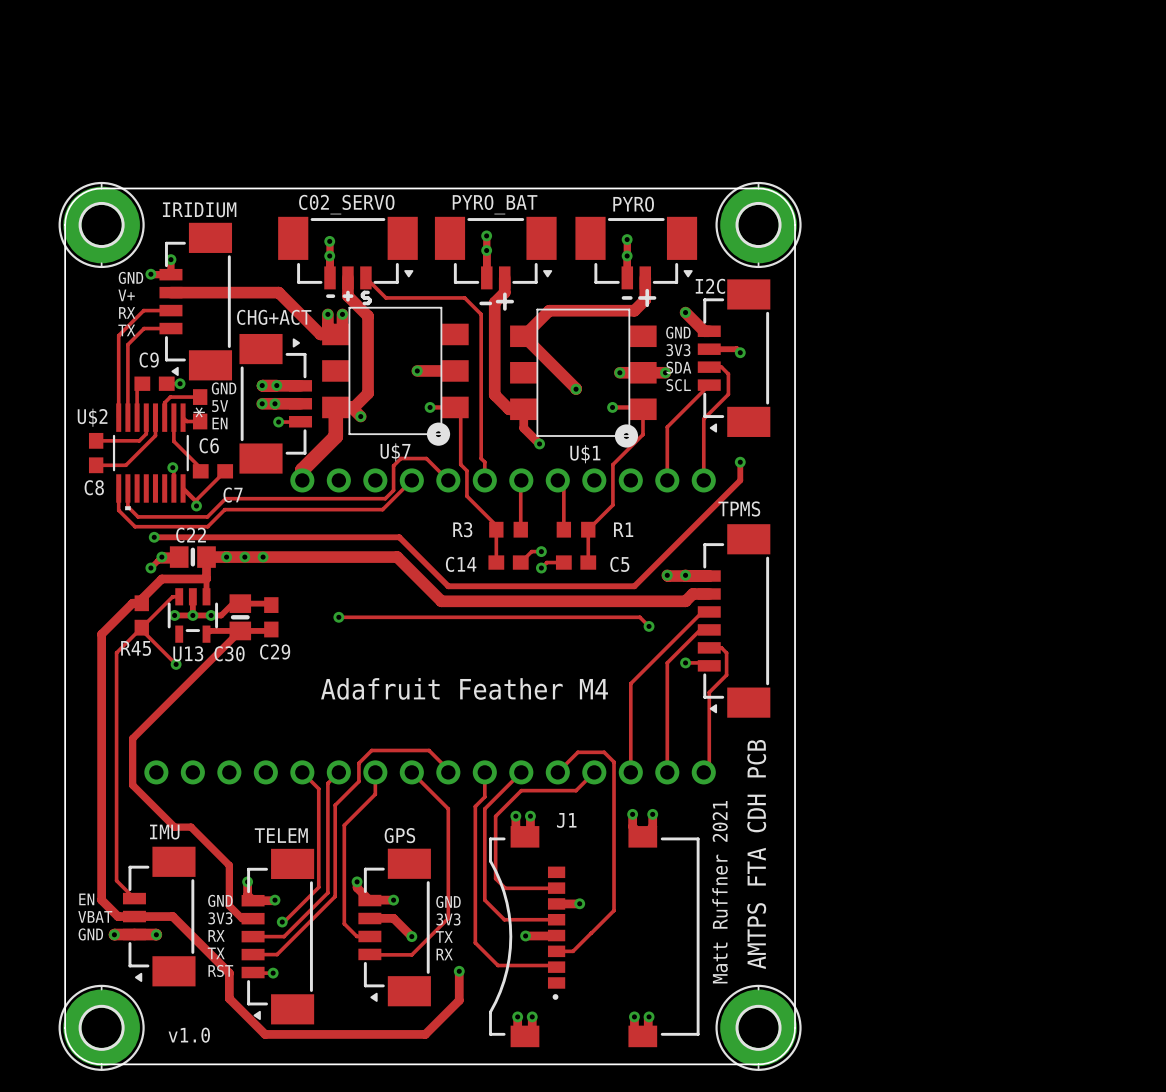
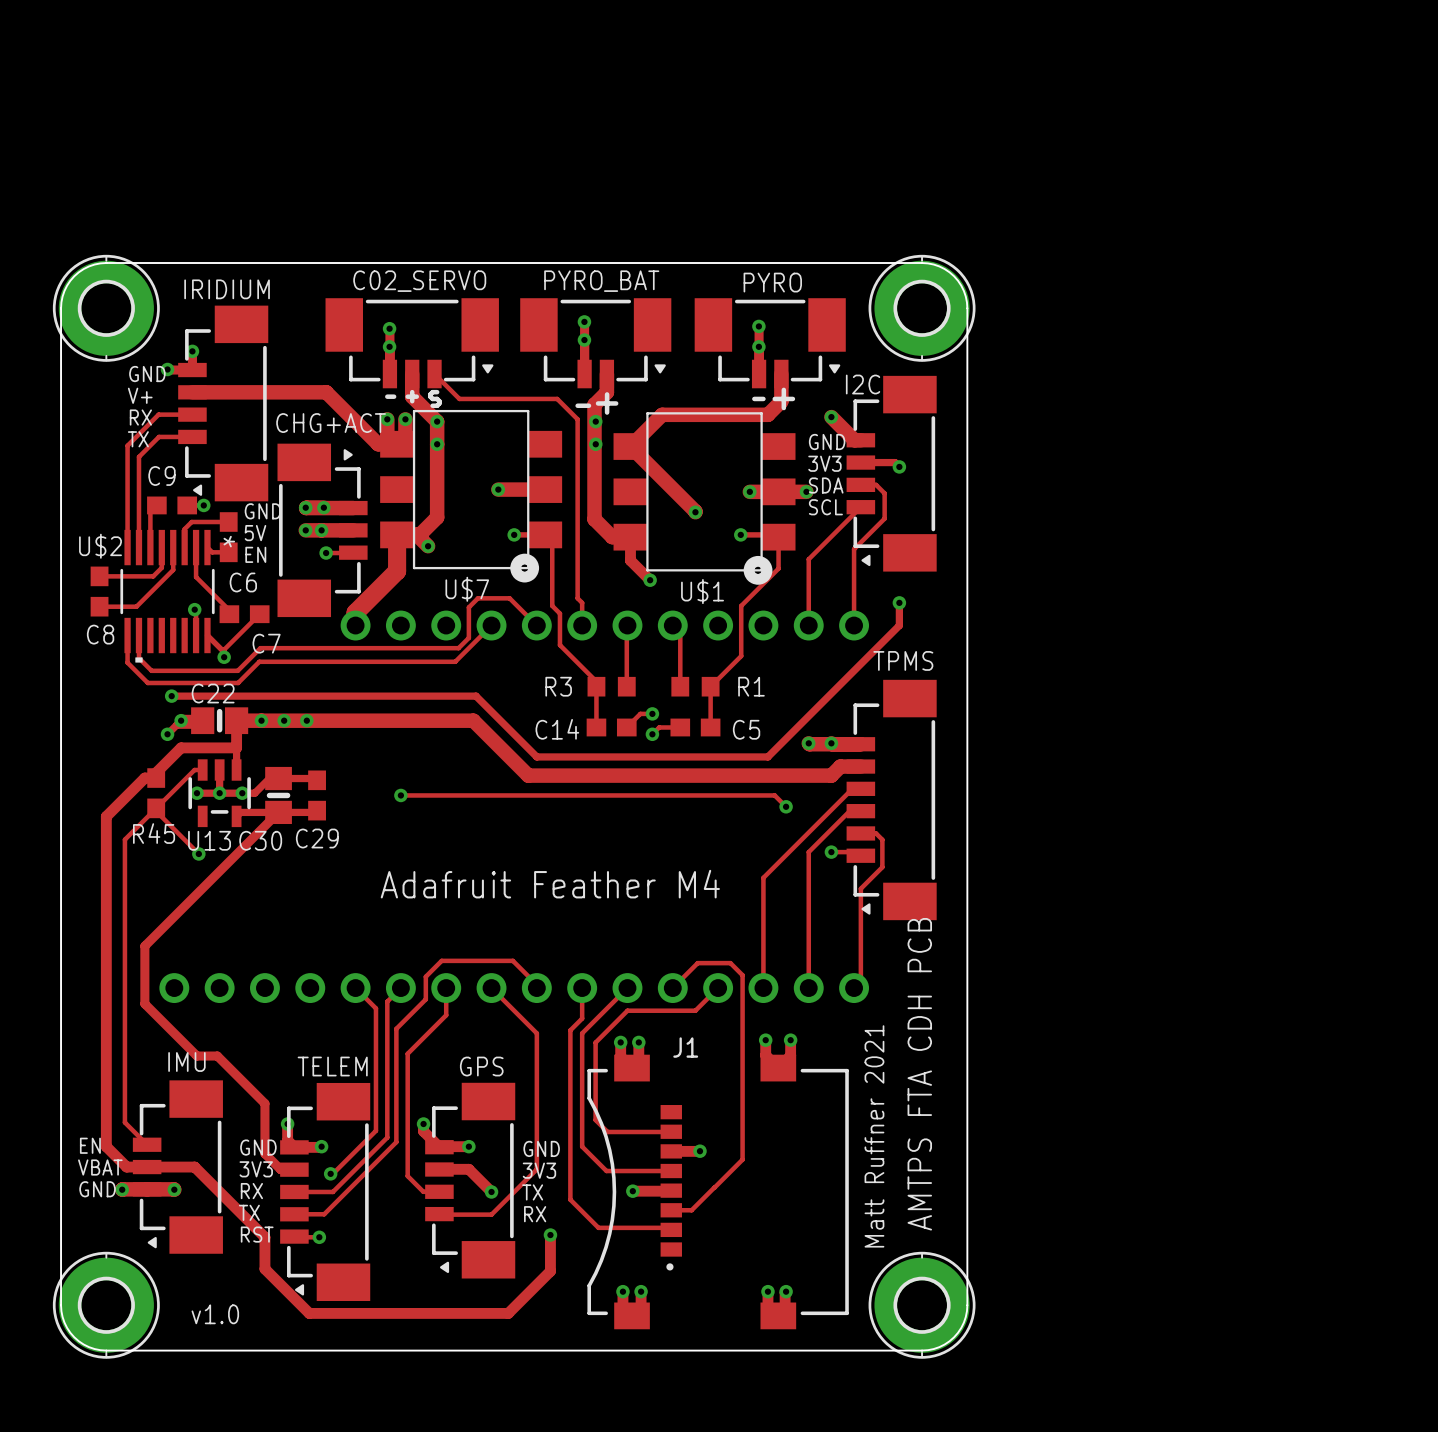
via: none -> (437, 421)
via: none -> (595, 421)
via: none -> (437, 444)
via: none -> (595, 444)

